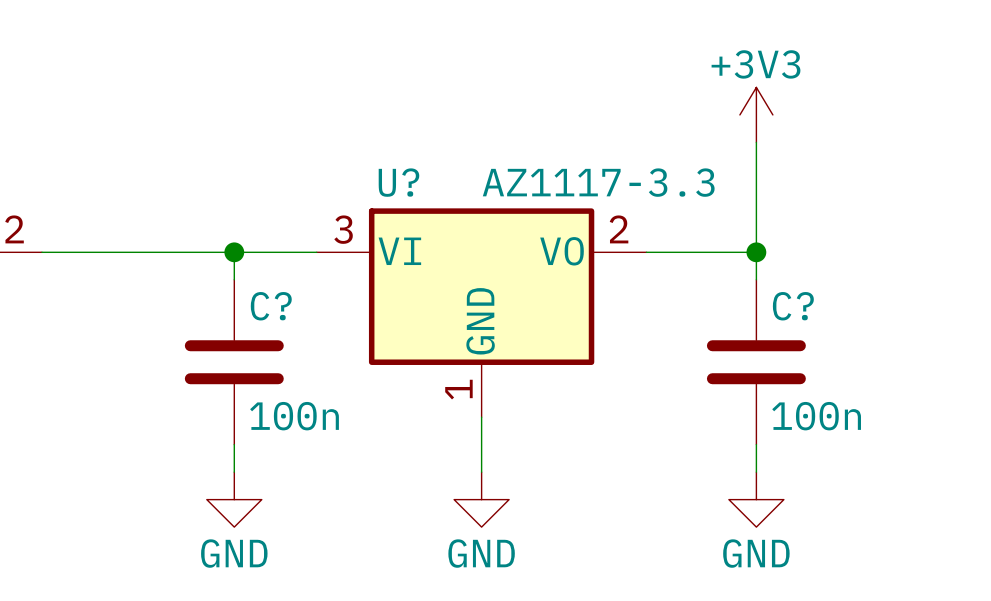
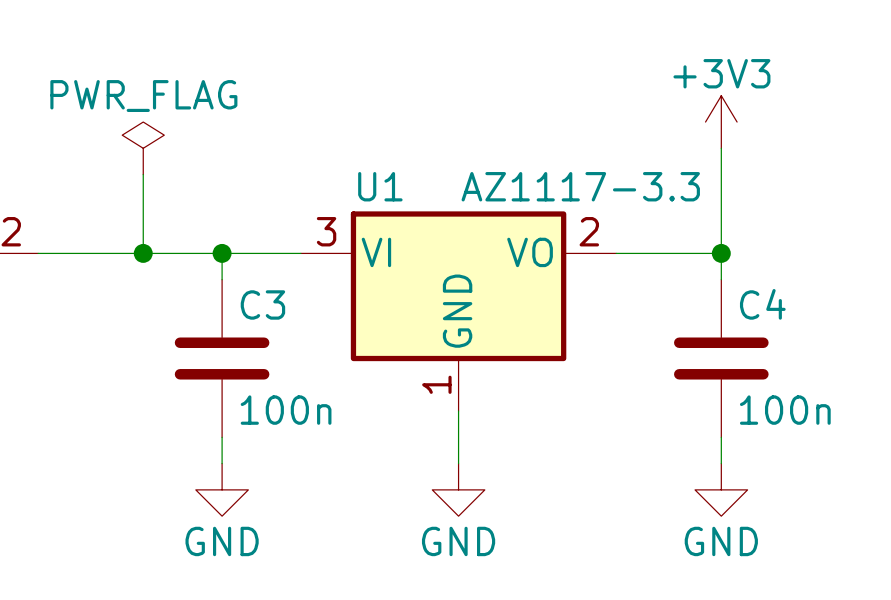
power symbol: none -> PWR_FLAG (143, 148)
wire: none -> (143, 174) (143, 253)
U? name: U? (398, 182) -> U1 (380, 186)
junction: none -> (143, 253)
C? name: C? (271, 306) -> C3 (262, 304)
C? name: C? (793, 306) -> C4 (762, 304)

